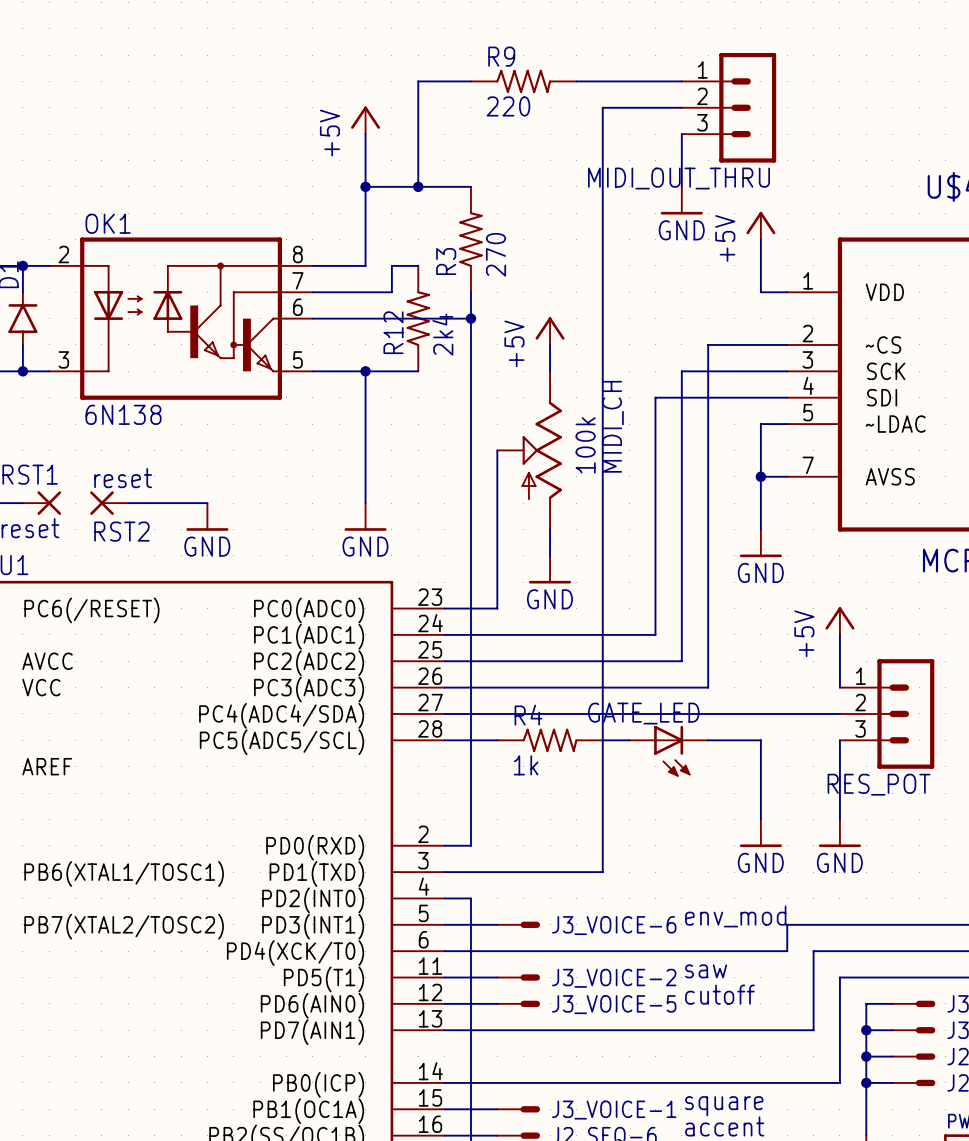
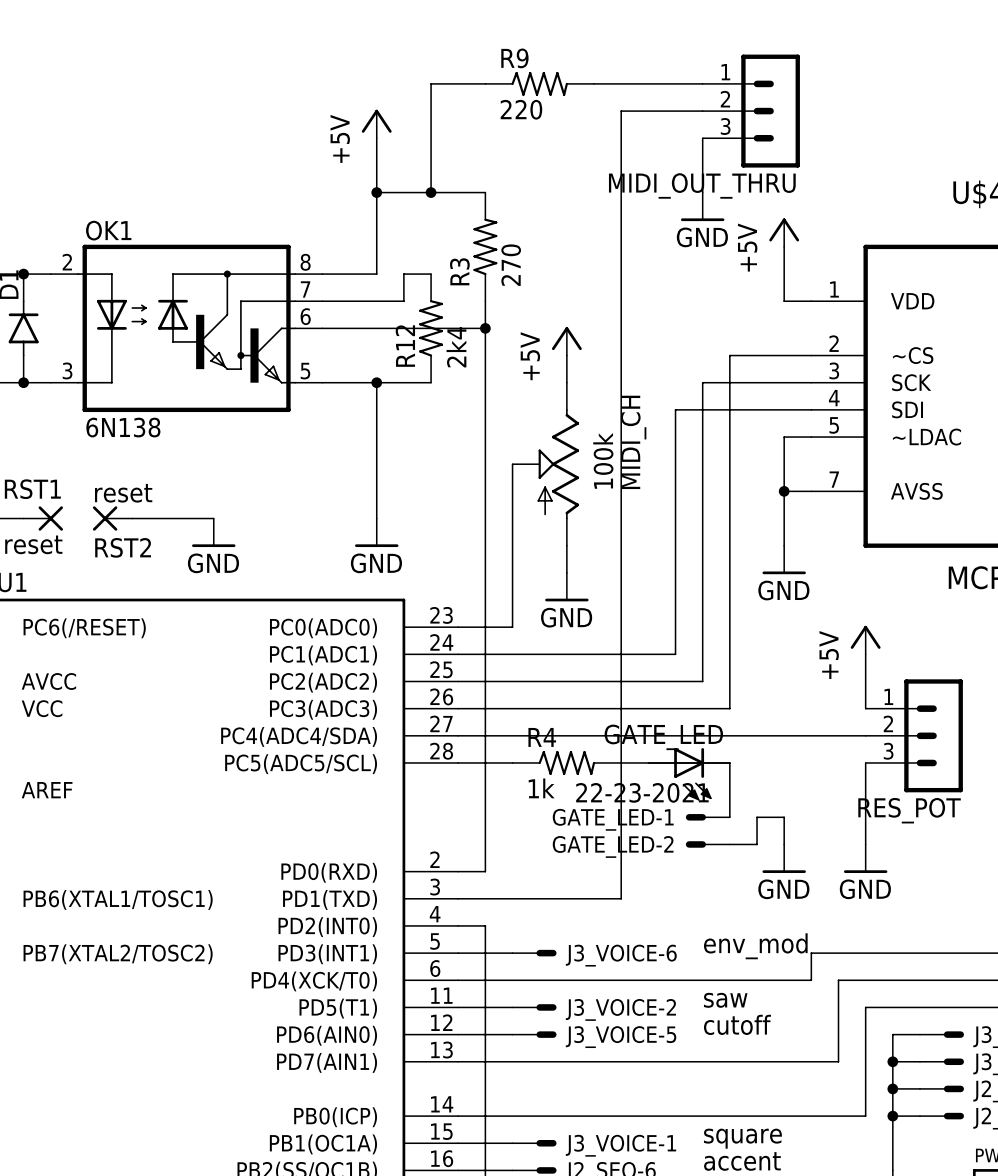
wire: none -> (648, 762) (729, 762) (729, 817)
wire: (708, 740) (760, 740) (760, 793) -> (729, 844) (757, 844) (757, 817) (784, 817)
GATE_LED-1: none -> 22-23-2021 (707, 817)
GATE_LED-2: none -> (707, 844)

